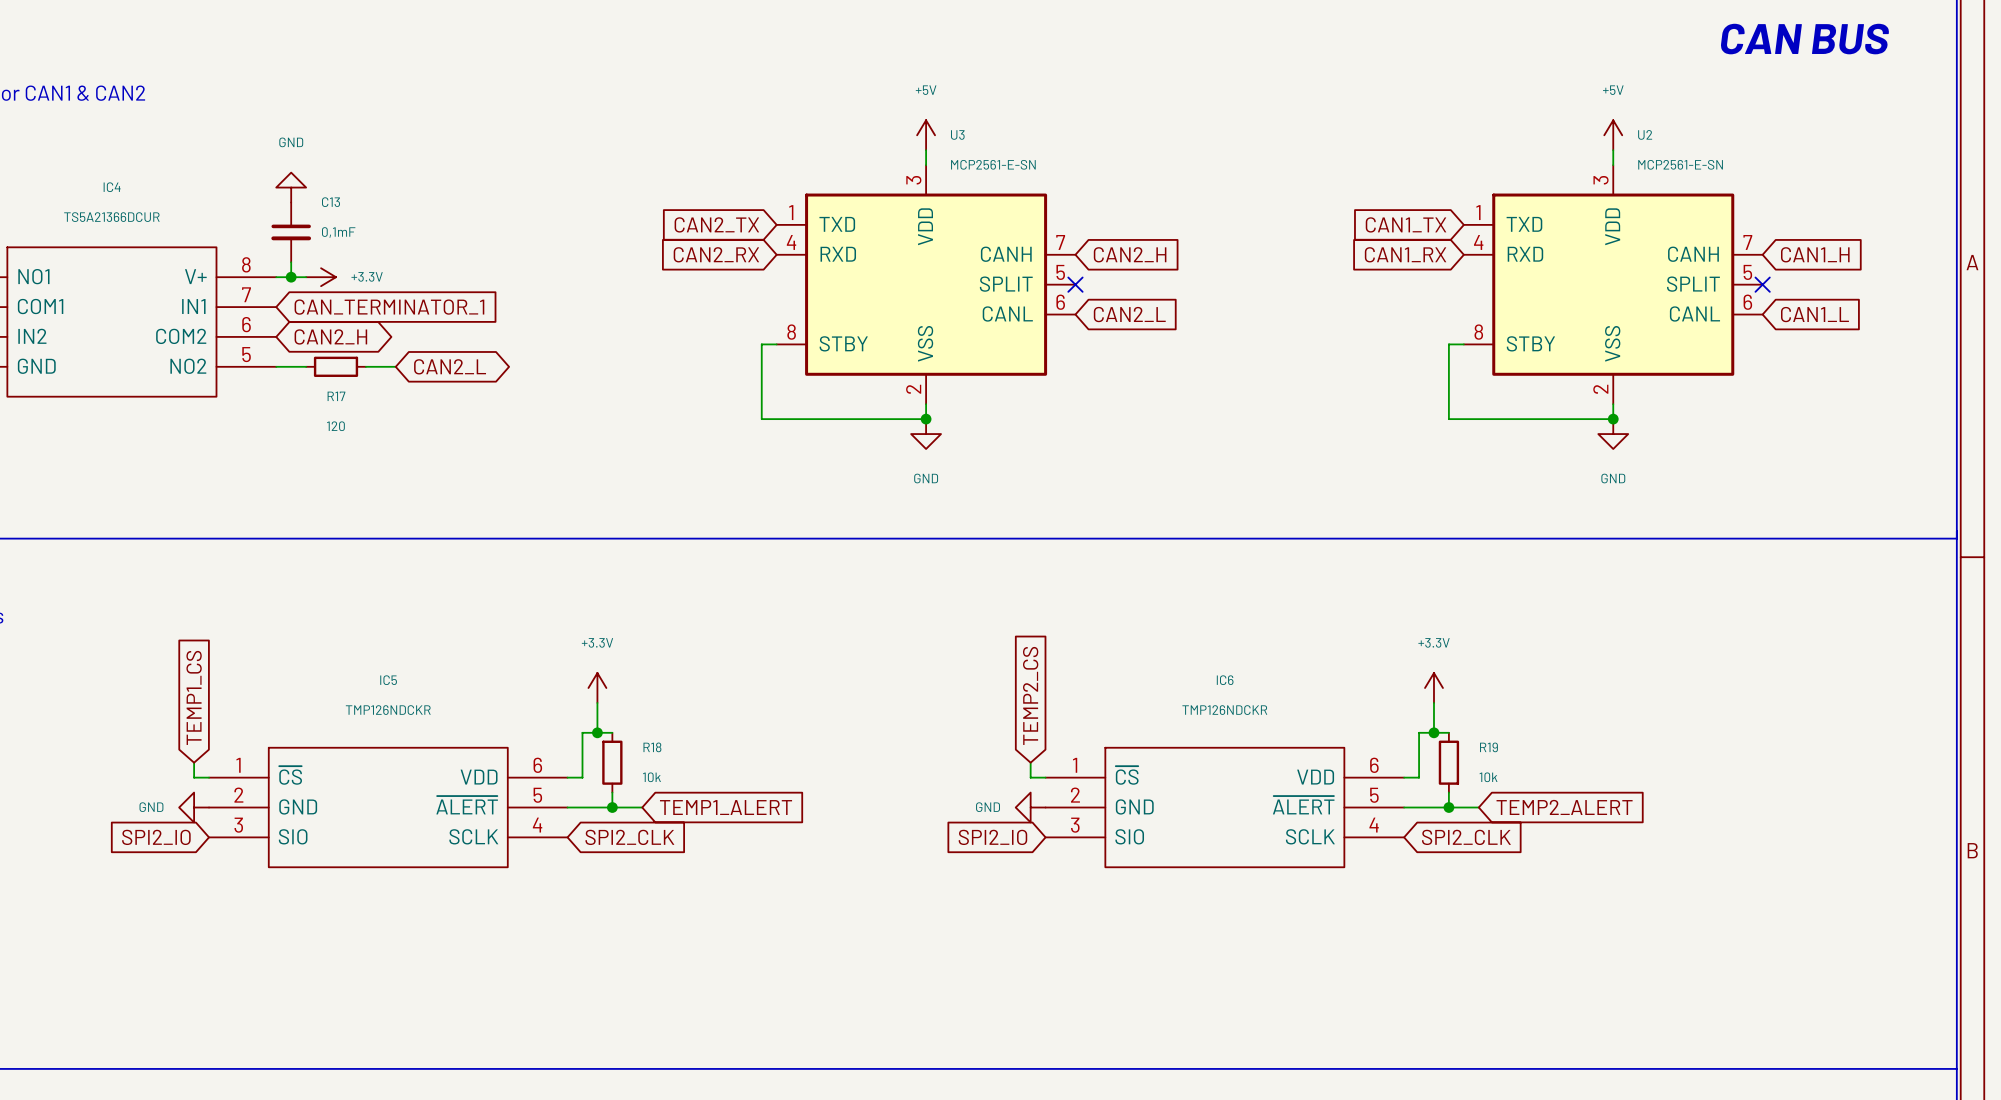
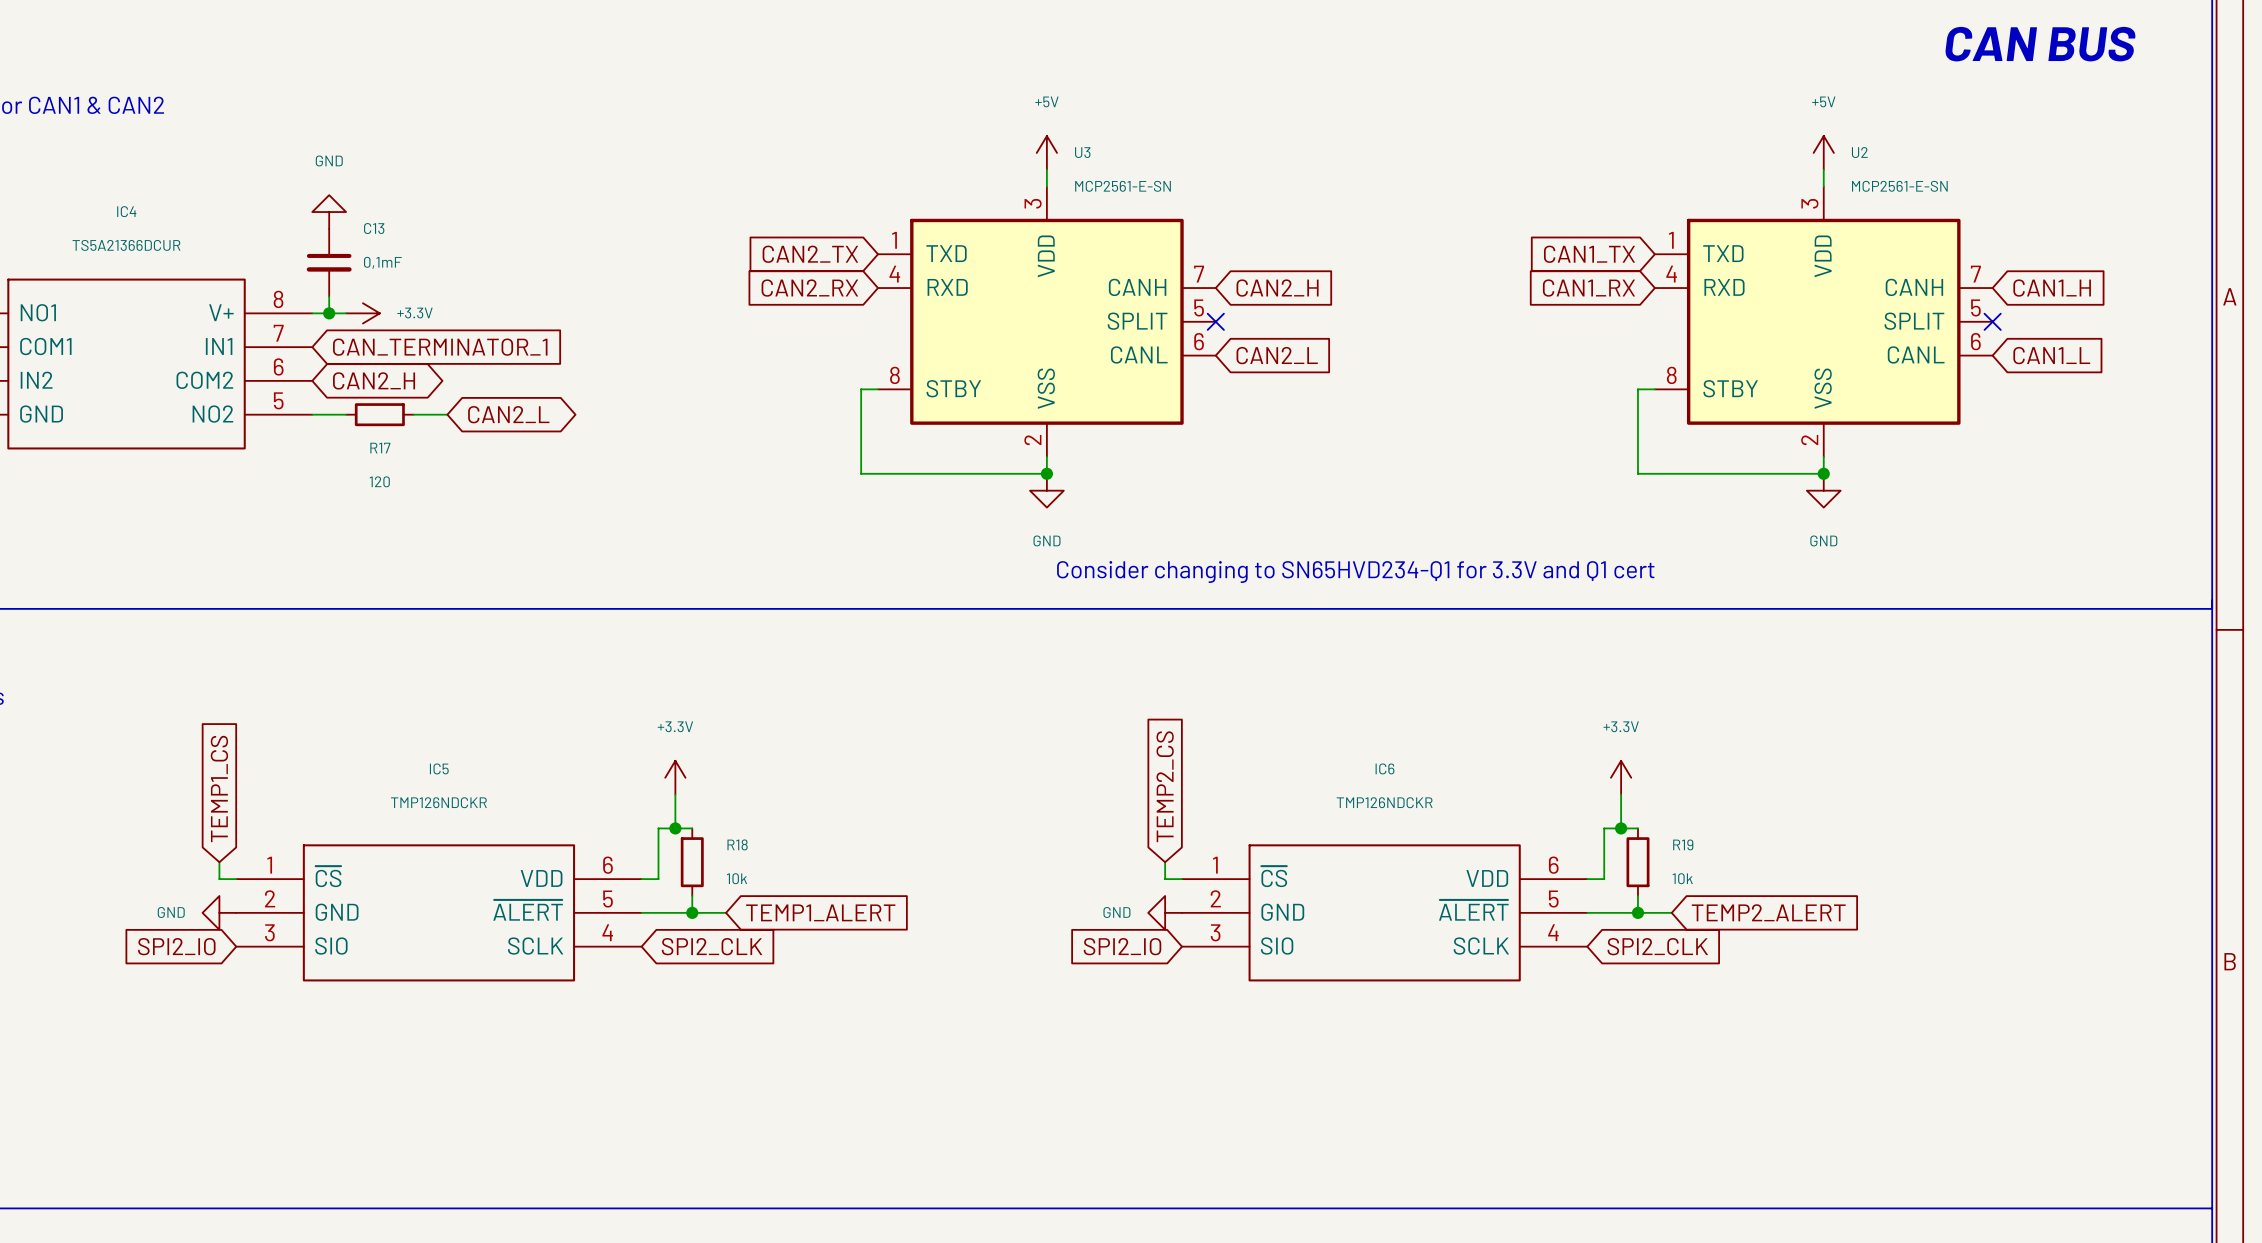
text: none -> Consider changing to SN65HVD234-Q1 for 3.3V and Q1 cert (1355, 572)

